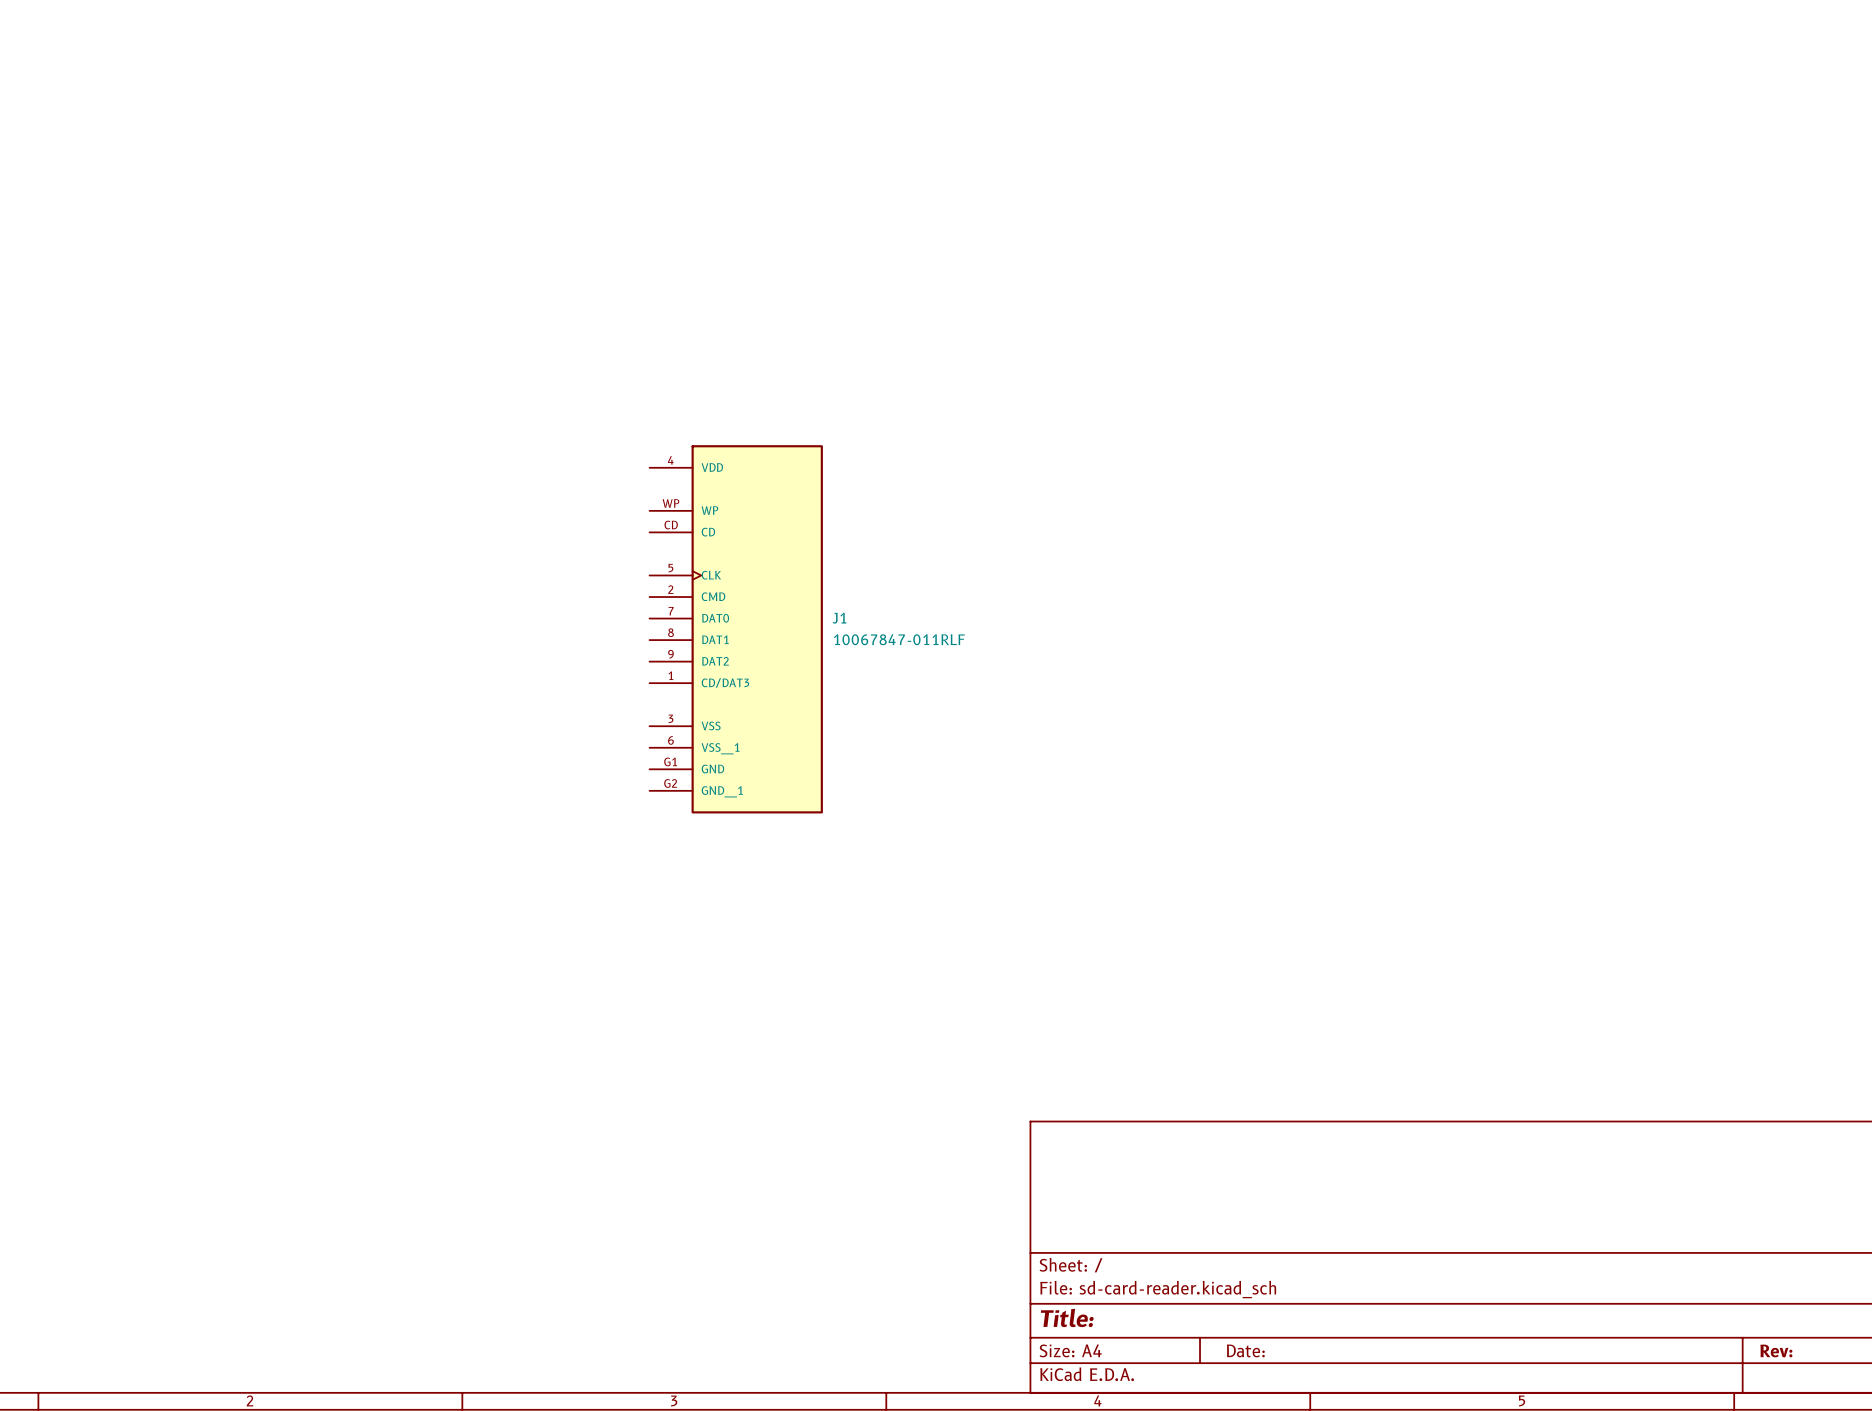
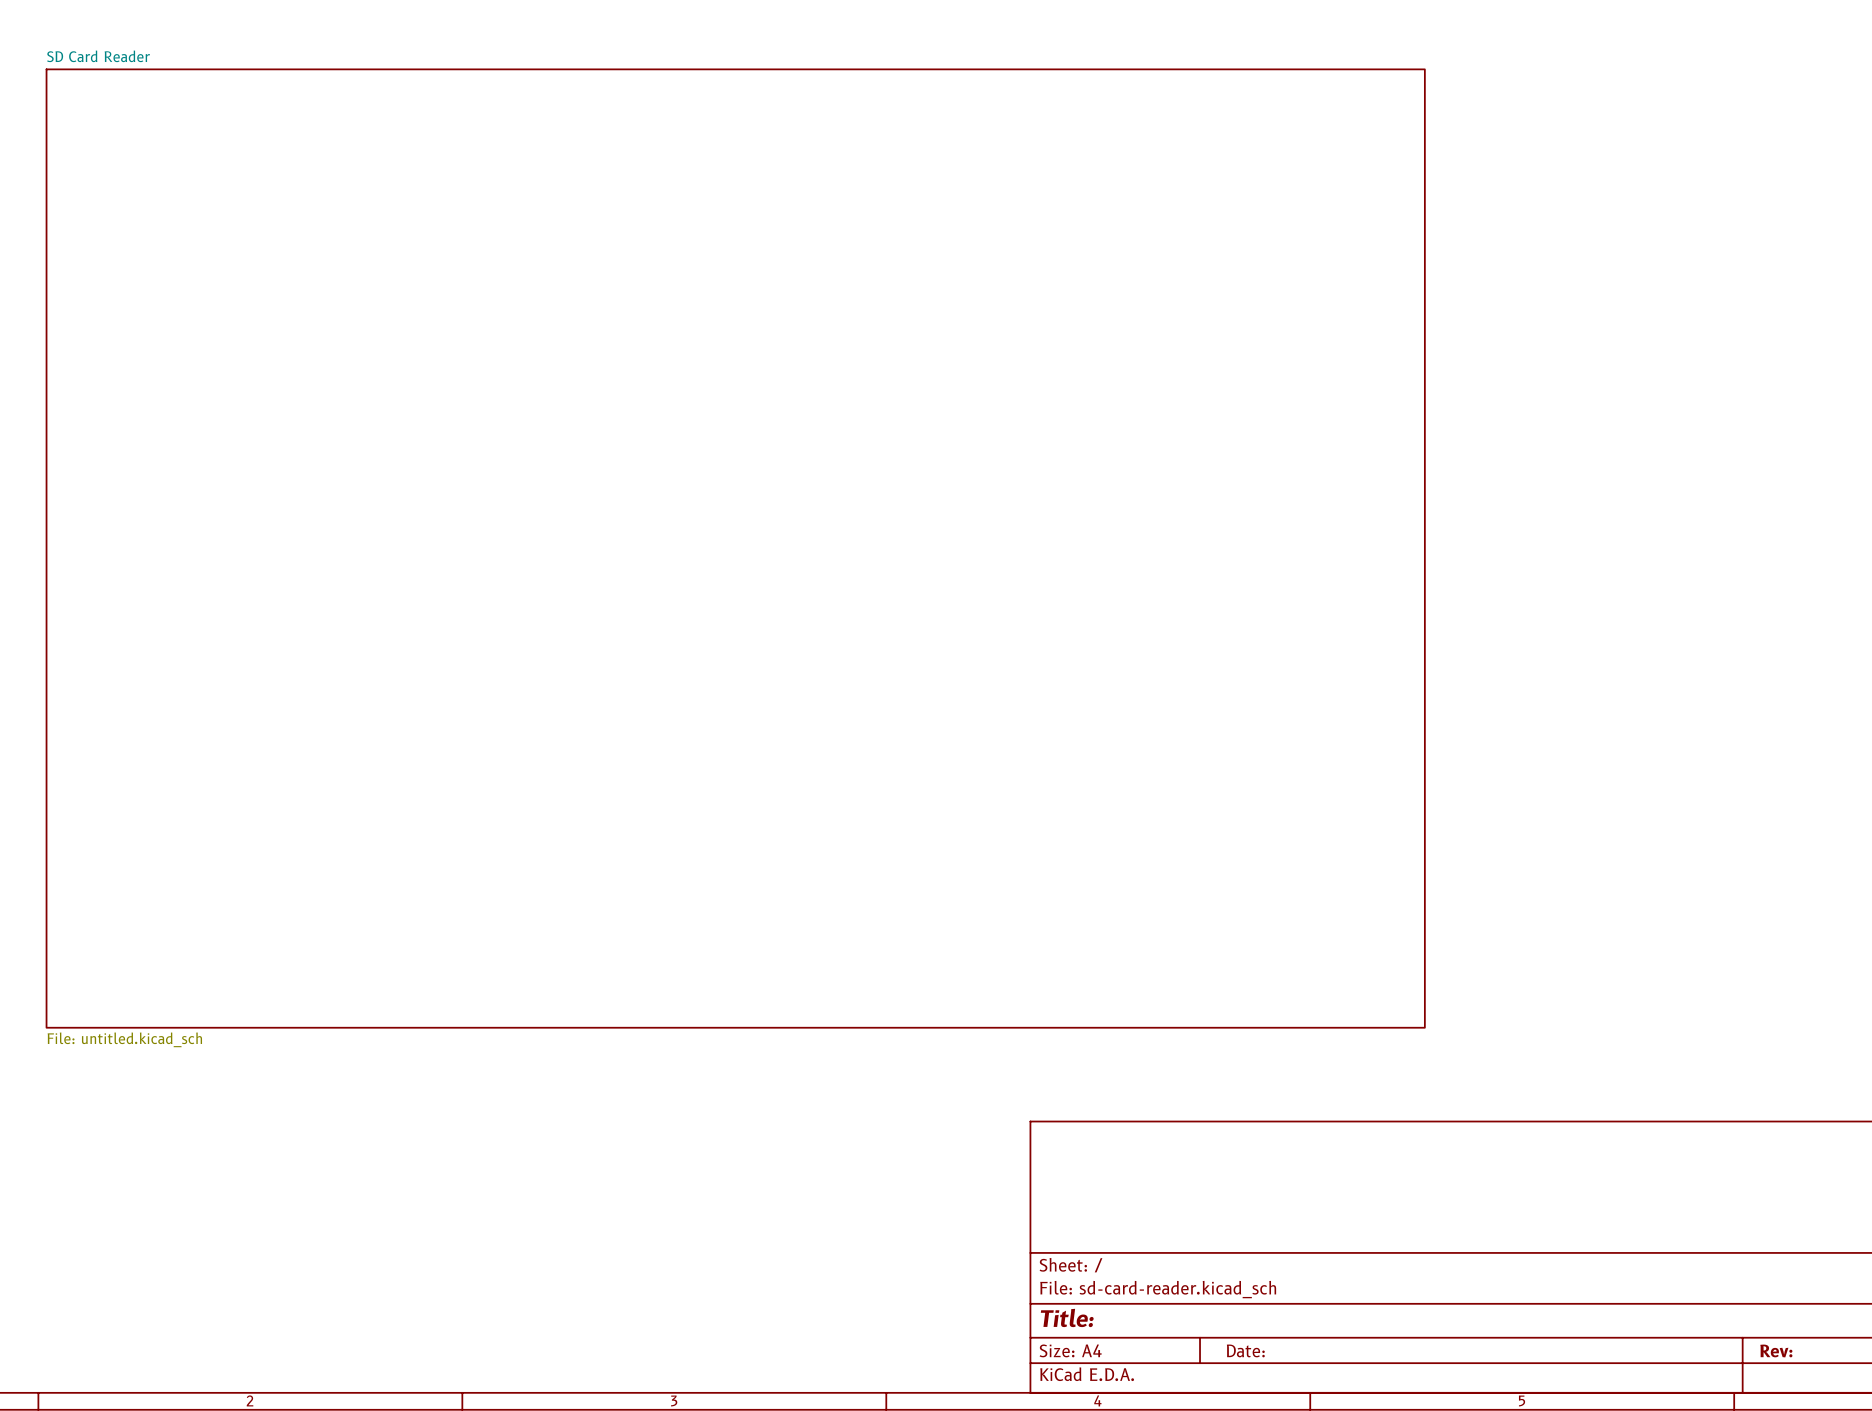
sheet SD Card Reader: none -> File: untitled.kicad_sch (735, 548)
J1: 10067847-011RLF (736, 629) -> none

